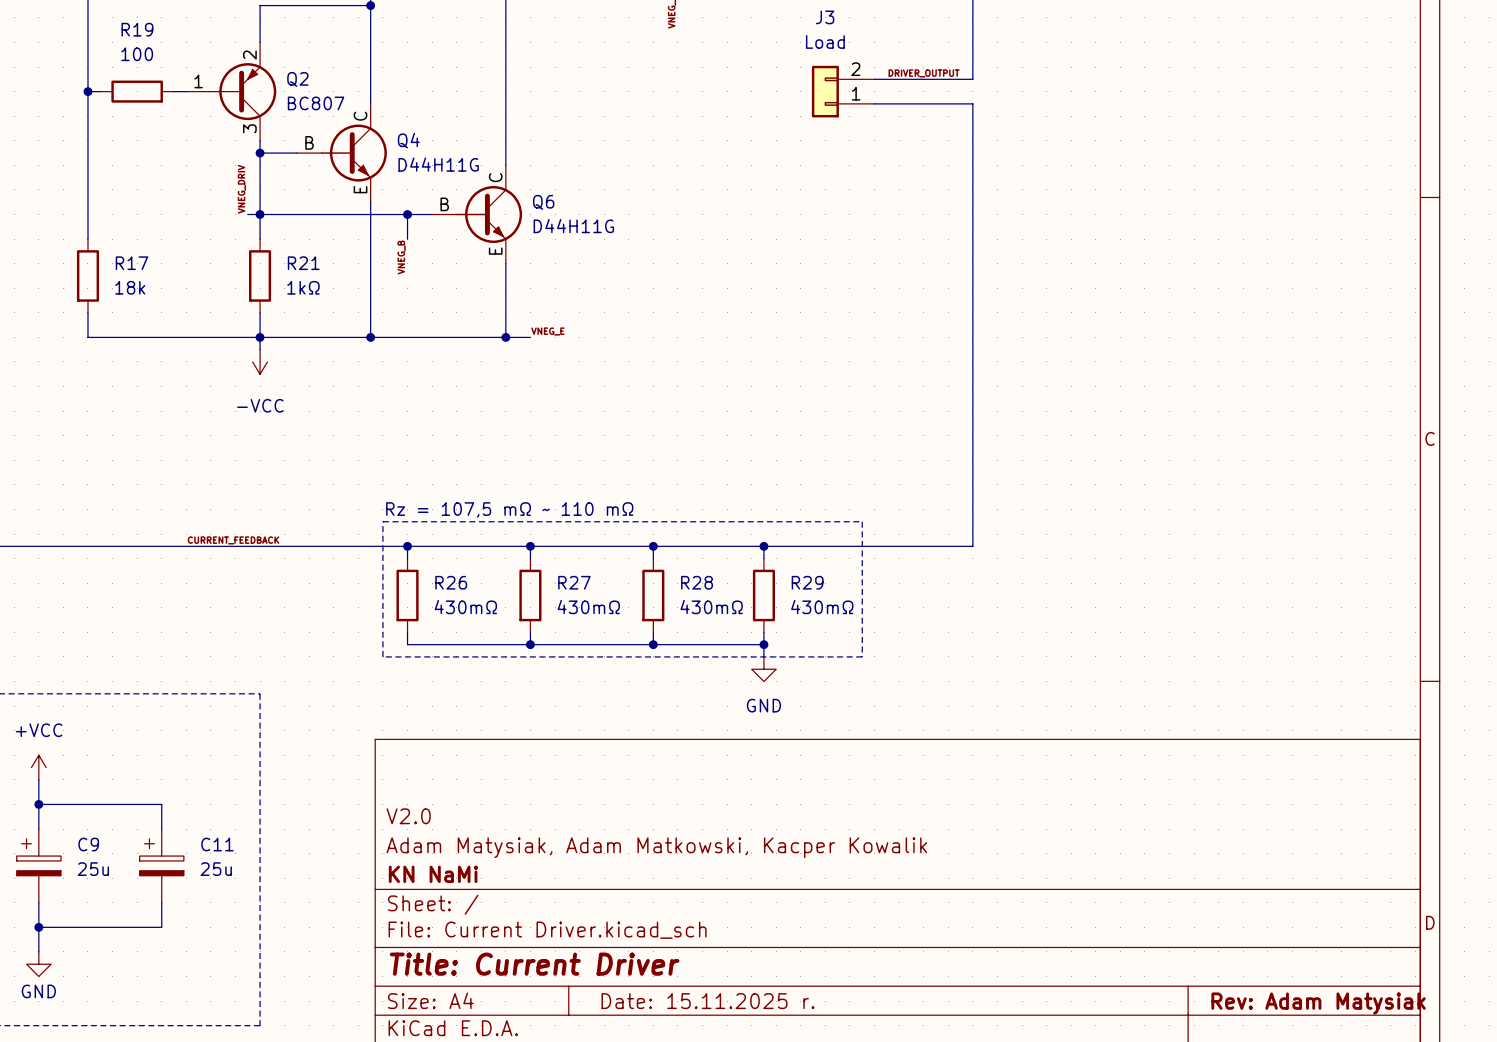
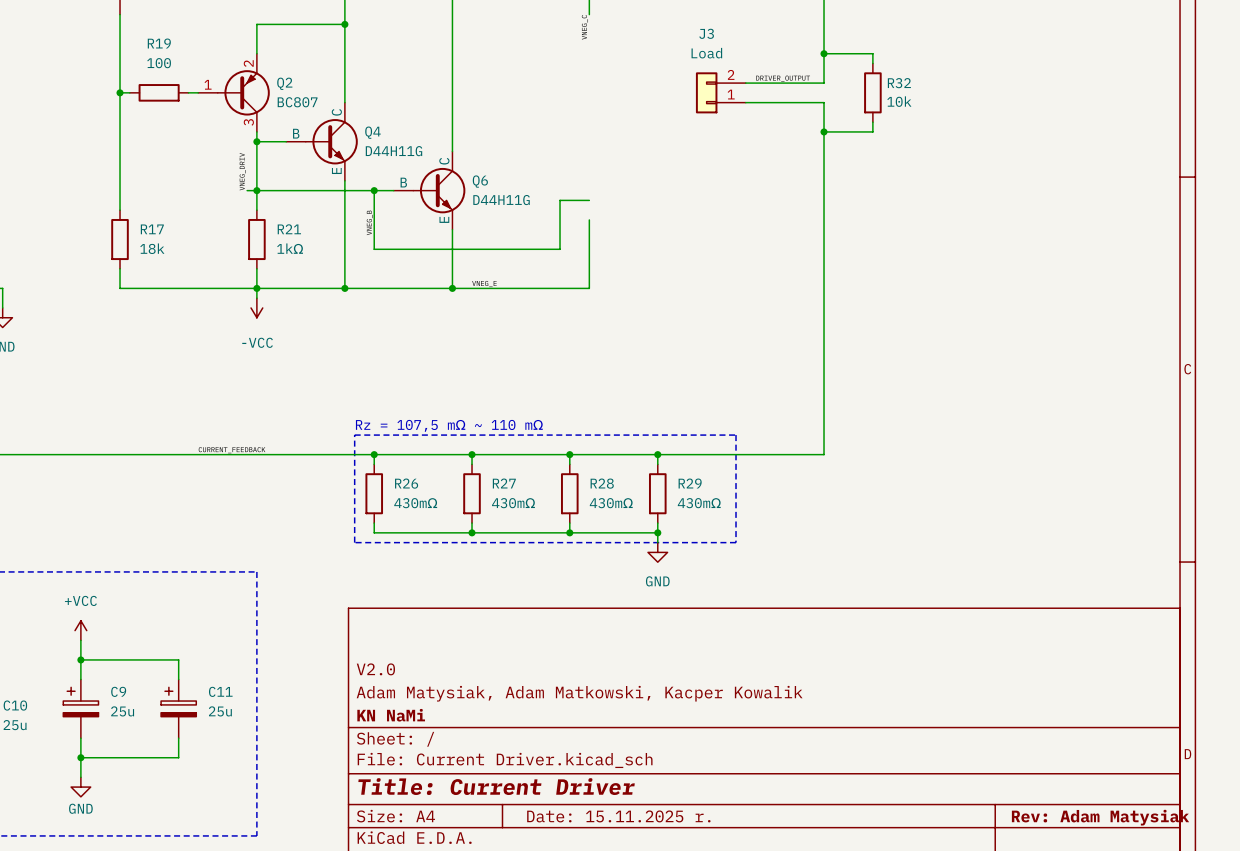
wire: none -> (824, 53) (872, 53) (872, 63)
junction: none -> (824, 53)
R32: none -> 10k (872, 92)
wire: none -> (872, 122) (872, 131) (824, 131)
junction: none -> (824, 131)
wire: none -> (589, 200) (560, 200) (560, 249) (374, 249) (374, 210)
wire: none -> (589, 219) (589, 288) (472, 288)

